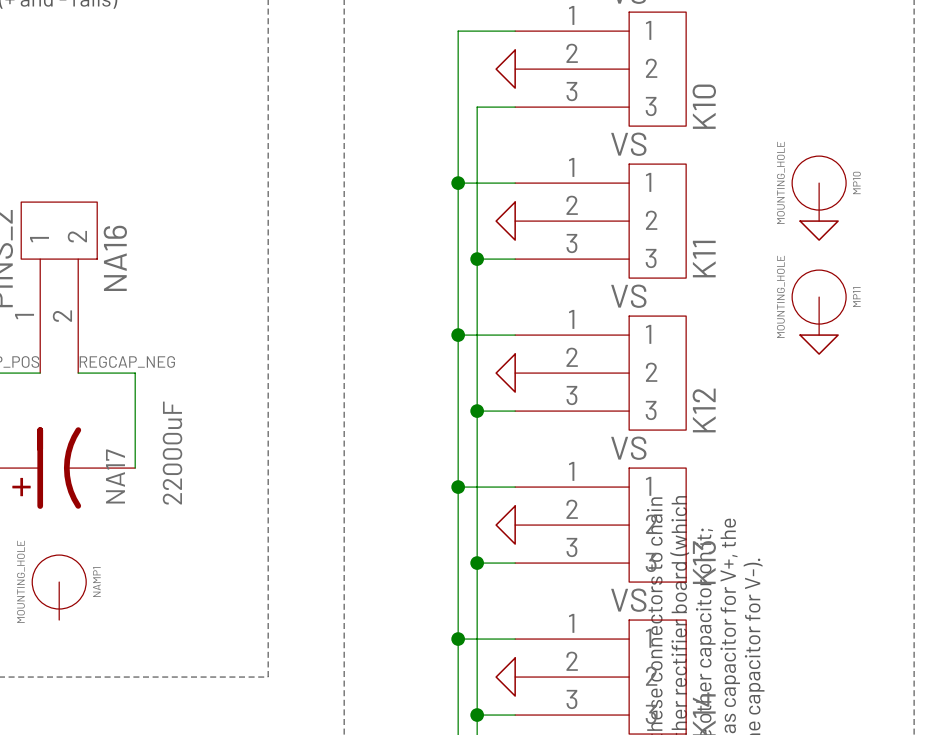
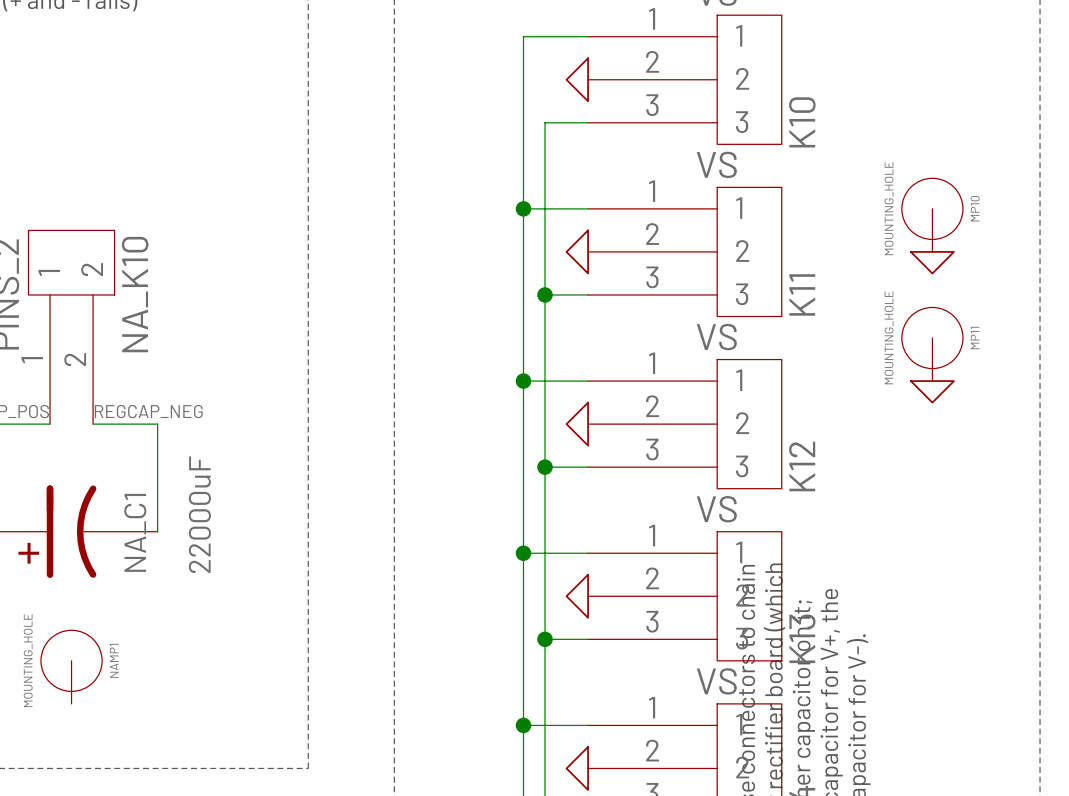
NA16 name: NA16 (115, 258) -> NA_K10 (135, 294)
NA17 name: NA17 (115, 476) -> NA_C1 (135, 532)

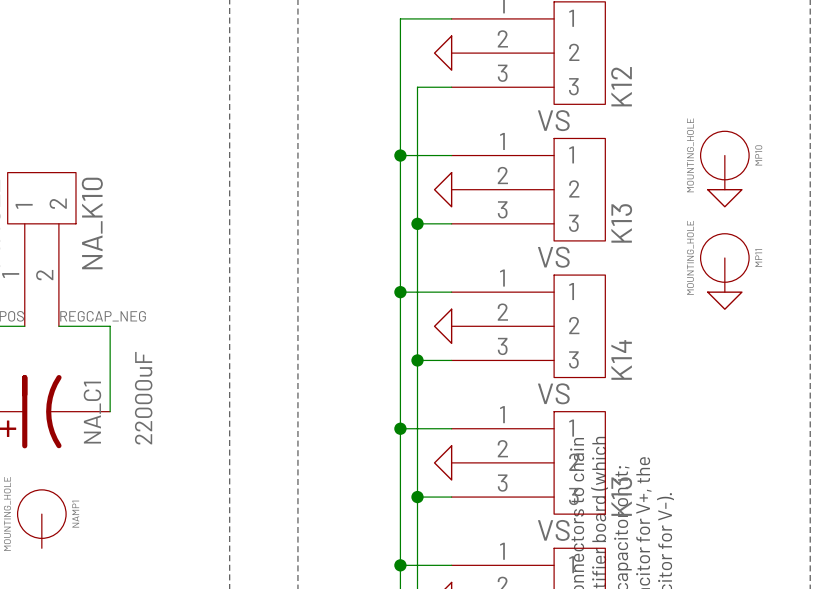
K10 name: K10 (802, 122) -> K12 (621, 86)
K11 name: K11 (802, 294) -> K13 (621, 223)
K12 name: K12 (802, 466) -> K14 (621, 359)

